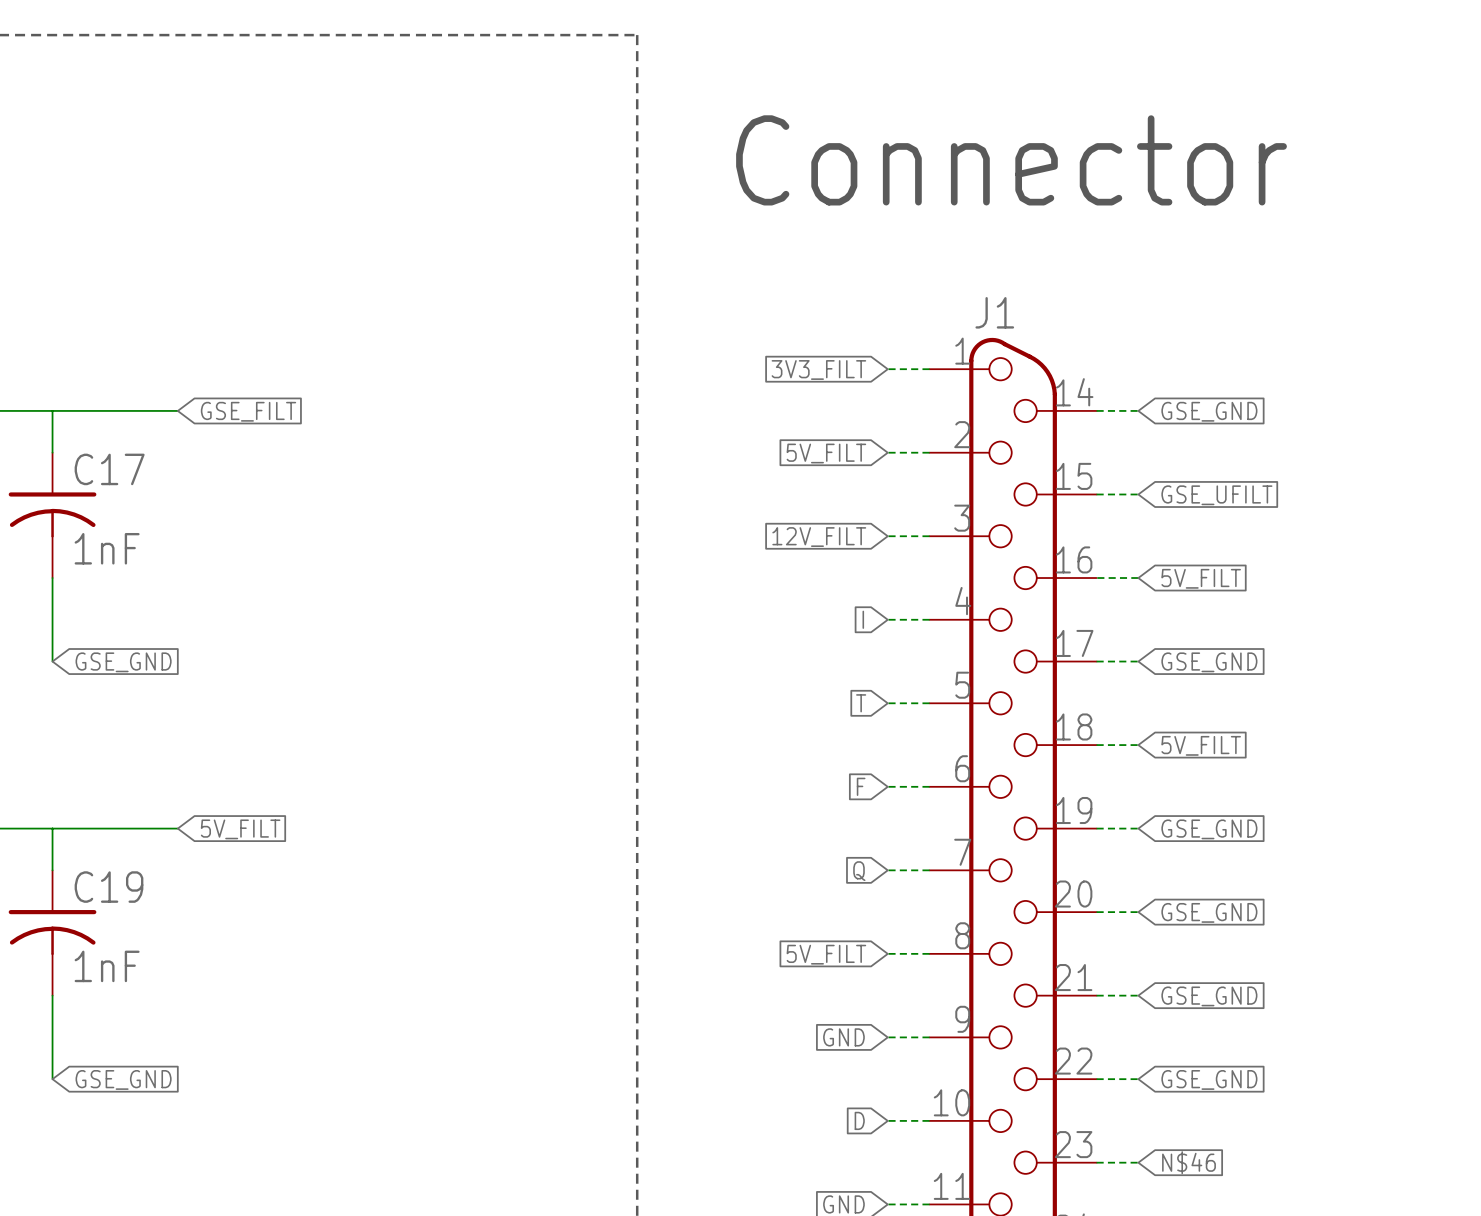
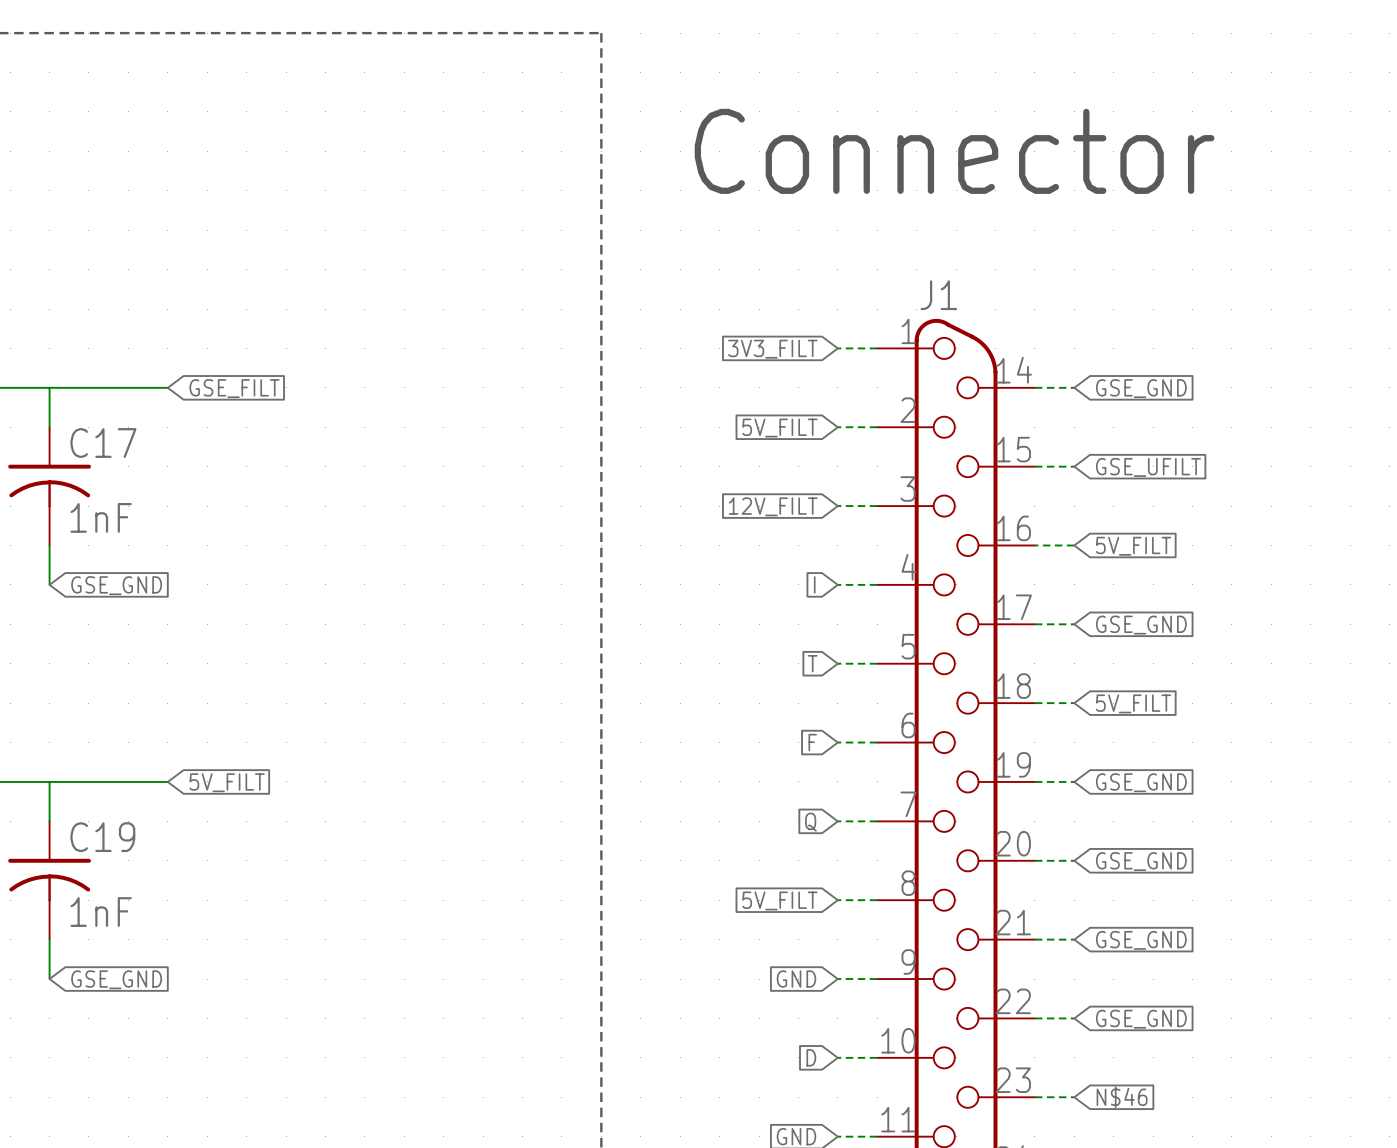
wire: (52, 619) (52, 661) -> none
global label position: GSE_GND (123, 662) -> GSE_GND (116, 585)
wire: (52, 1037) (52, 1079) -> none
global label position: GSE_GND (123, 1079) -> GSE_GND (116, 979)

